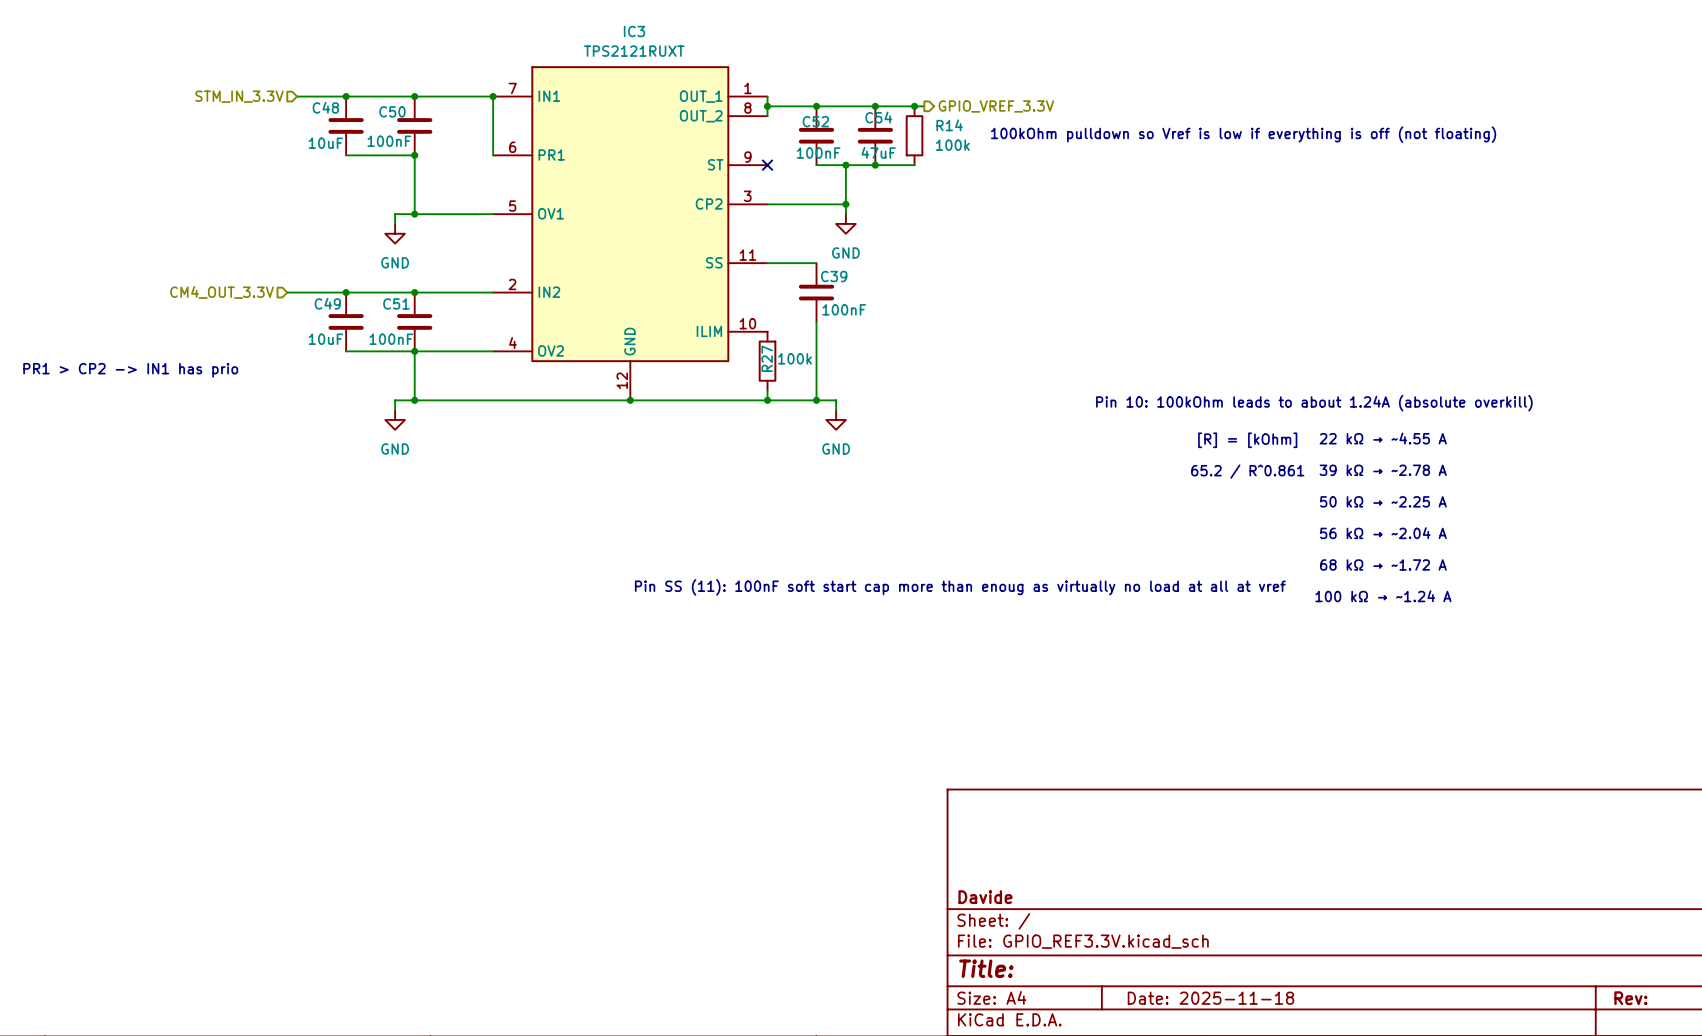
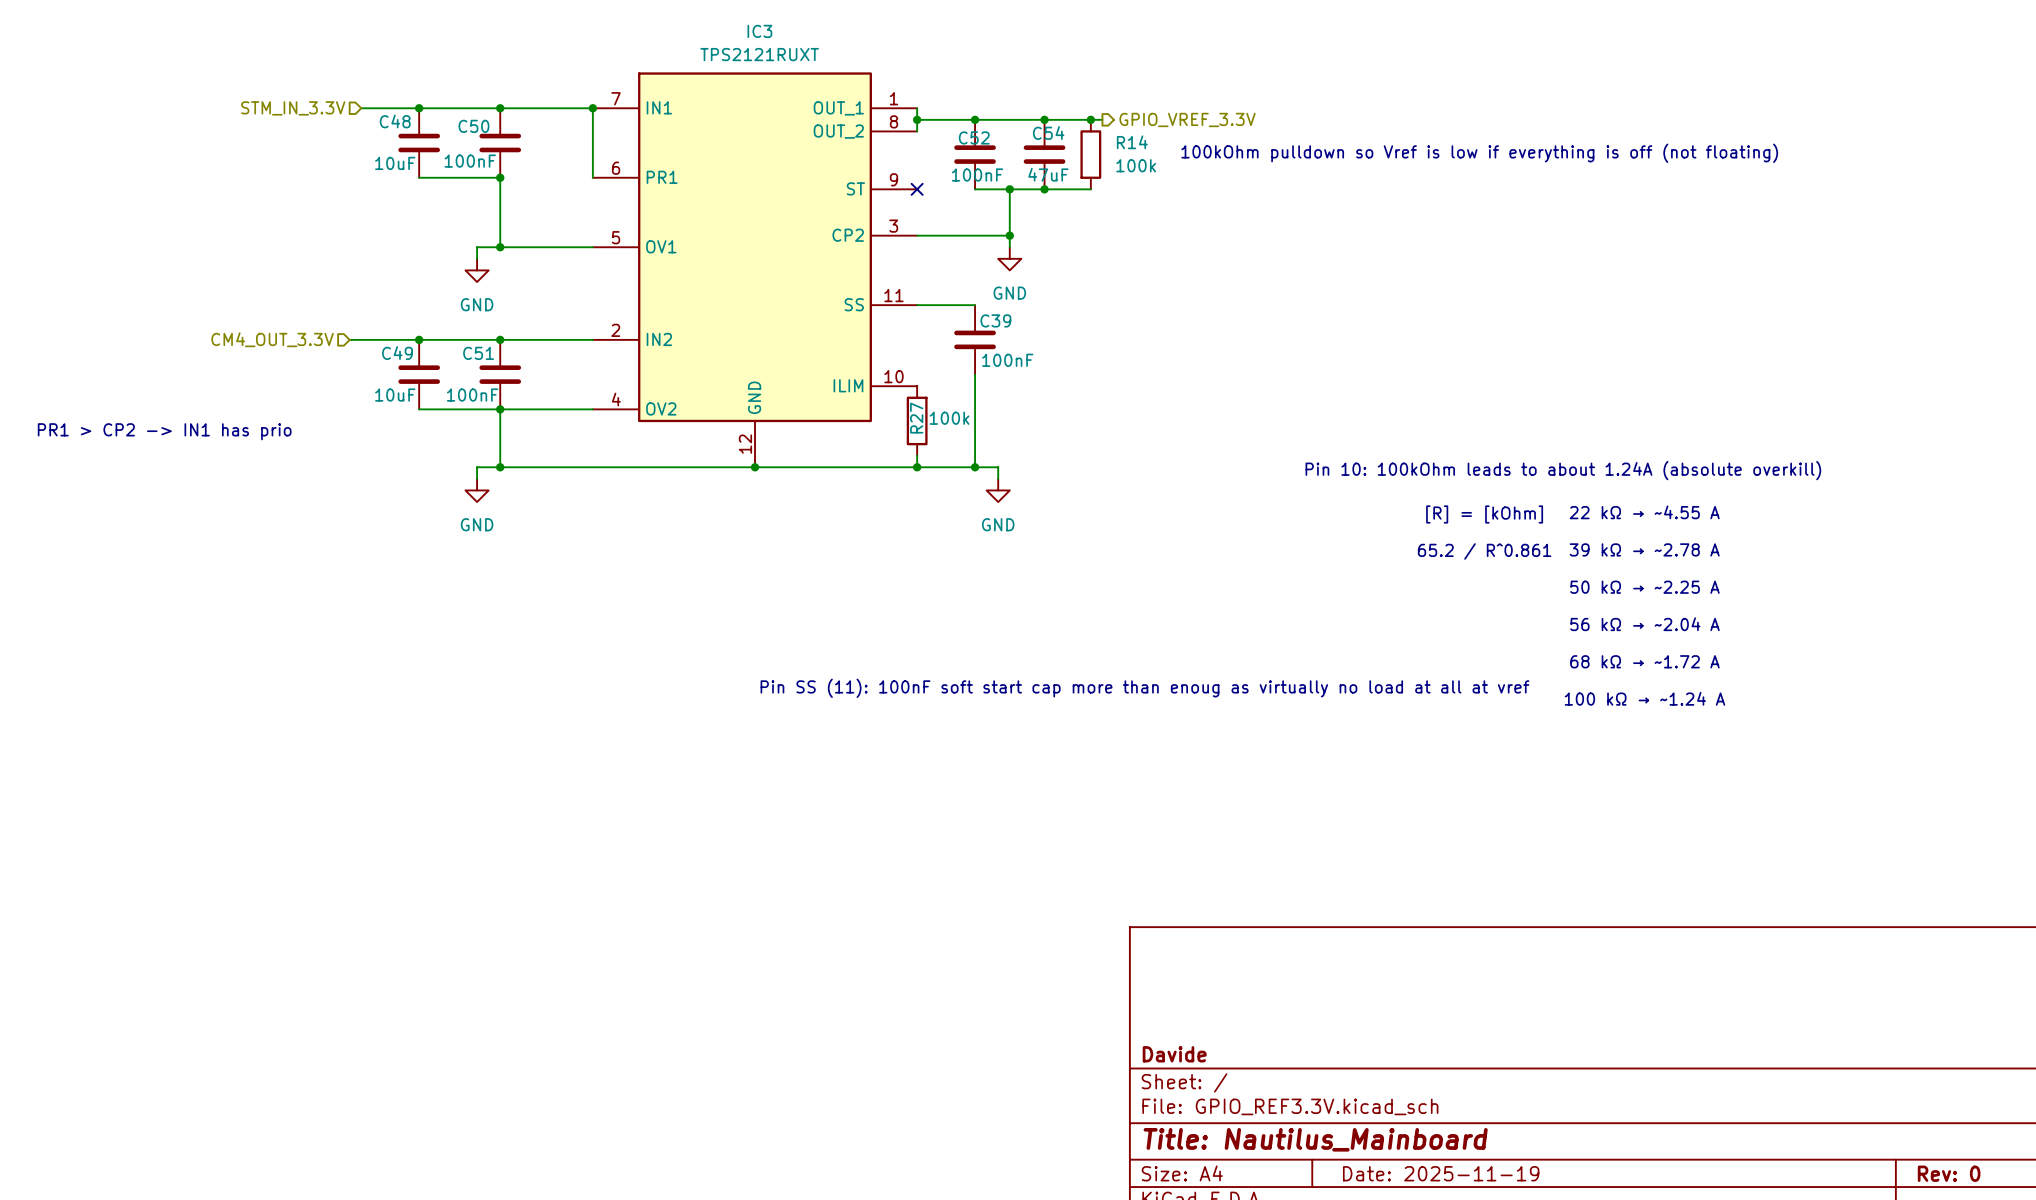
title block: Title: (986, 968) -> Title: Nautilus_Mainboard (1315, 1139)
title block: Date: 2025-11-18 (1210, 998) -> Date: 2025-11-19 (1441, 1173)
title block: Rev: (1630, 998) -> Rev: 0 (1949, 1173)

